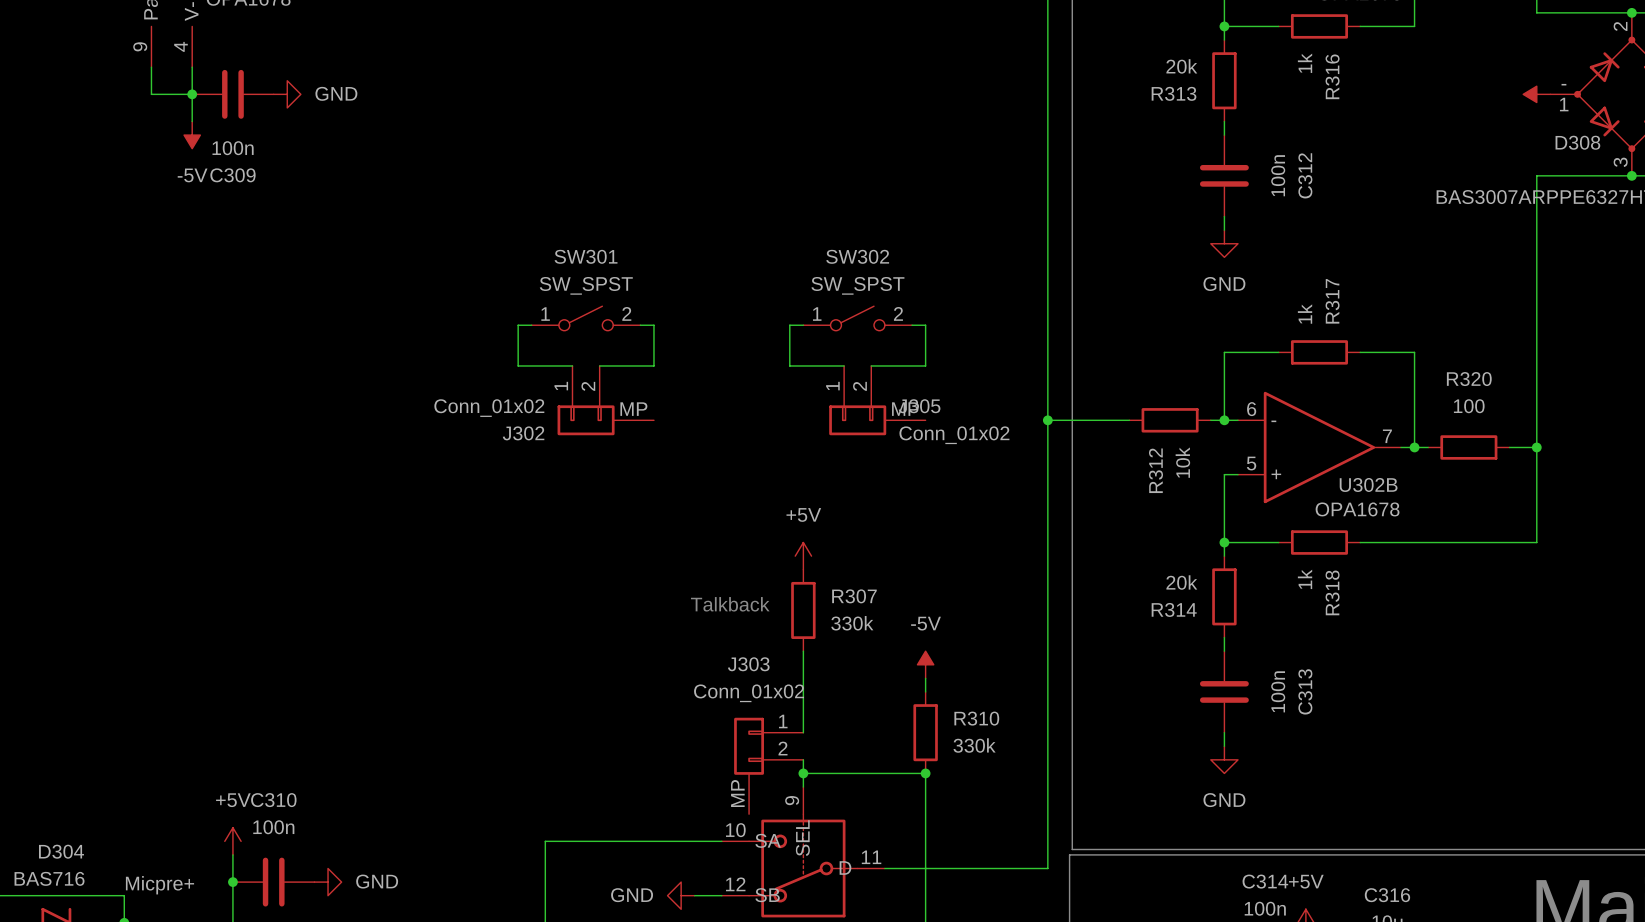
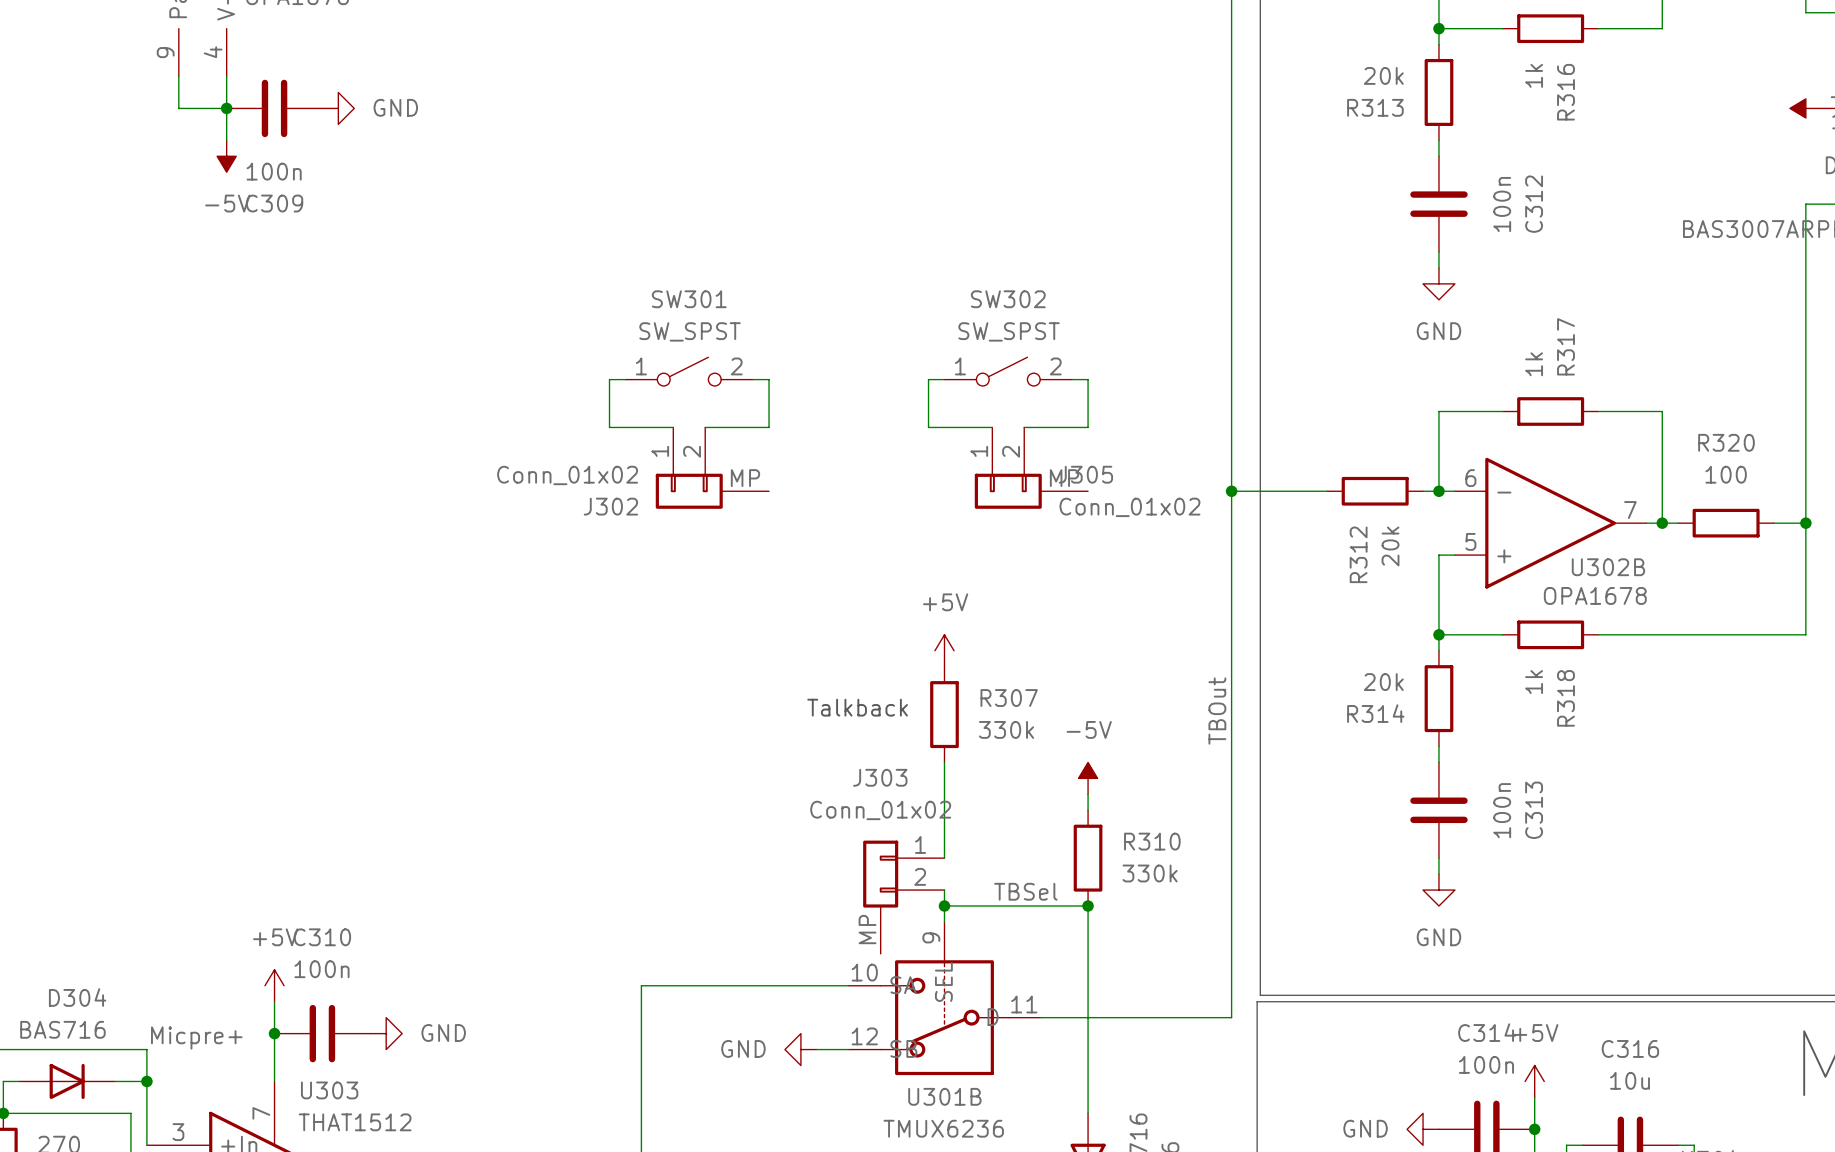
R312 value: 10k (1182, 462) -> 20k (1390, 546)
label: none -> TBOut (1217, 711)
label: none -> TBSel (1025, 891)

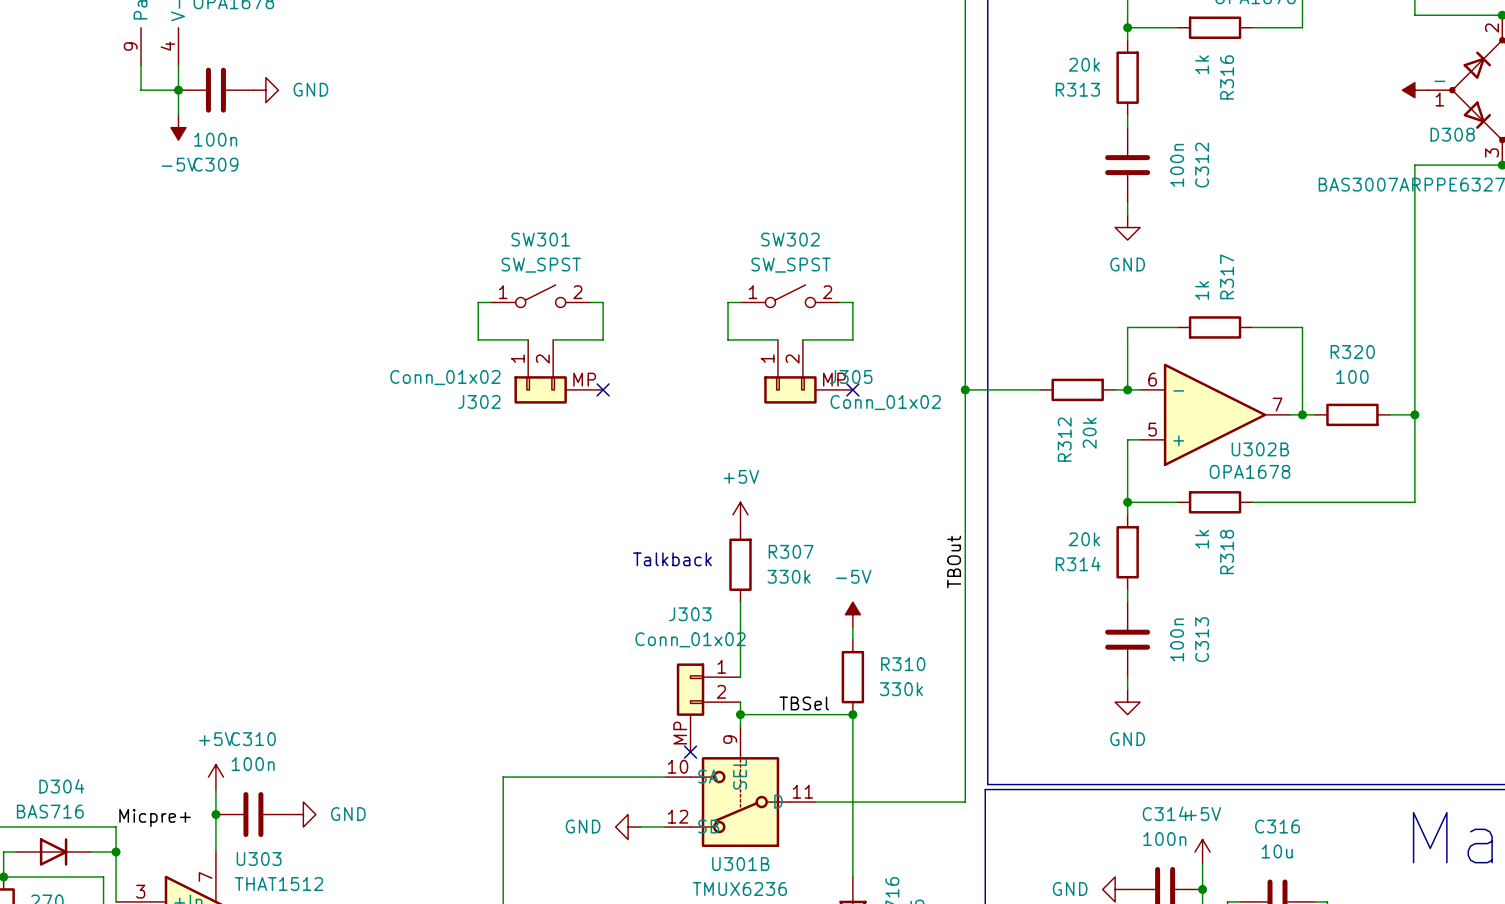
no-connect mark: none -> (603, 389)
no-connect mark: none -> (852, 389)
no-connect mark: none -> (690, 752)

